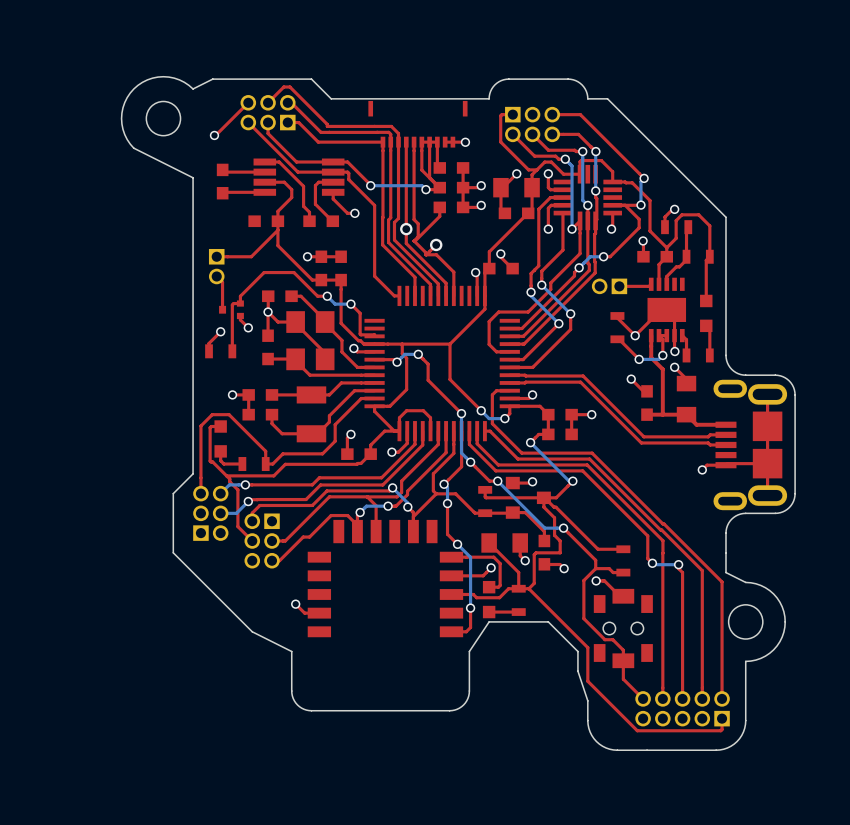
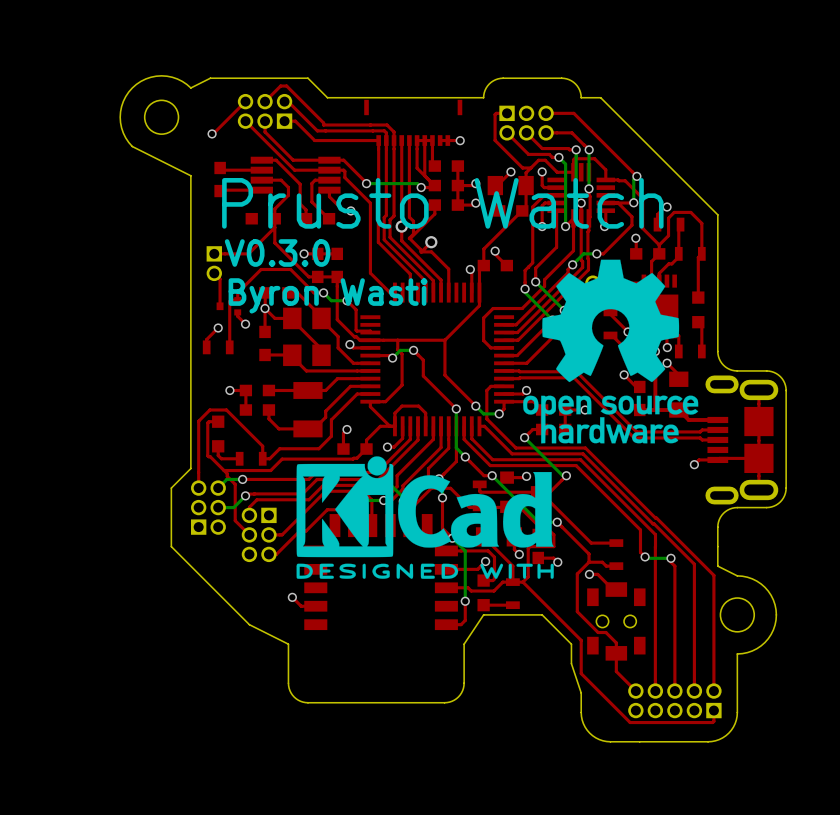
text: none -> Prusto Watch (442, 203)
text: none -> V0.3.0 (277, 253)
drawing: none -> [296, 259, 699, 579]
text: none -> Byron Wasti (328, 295)

